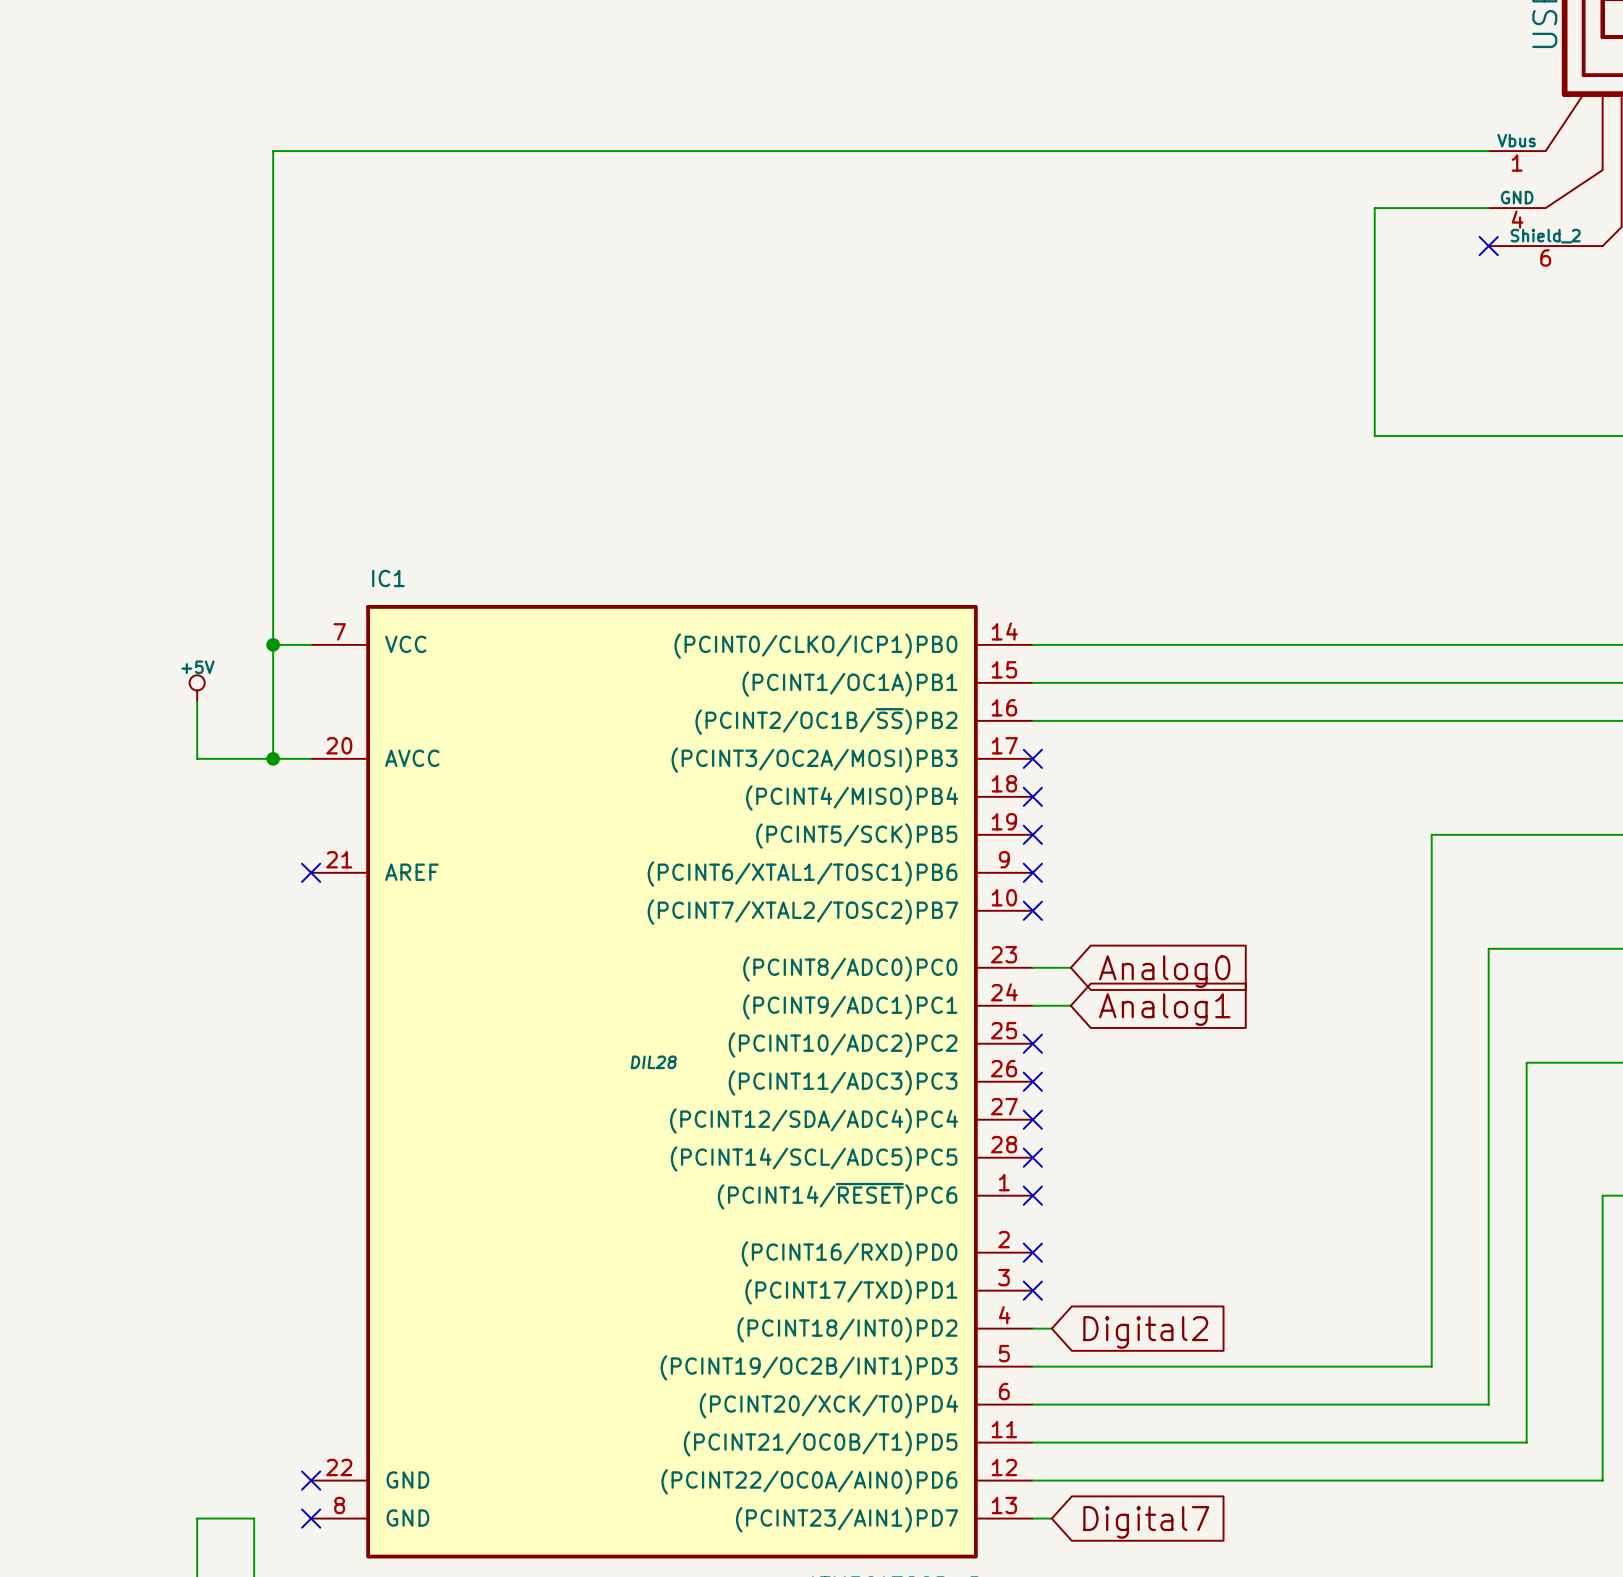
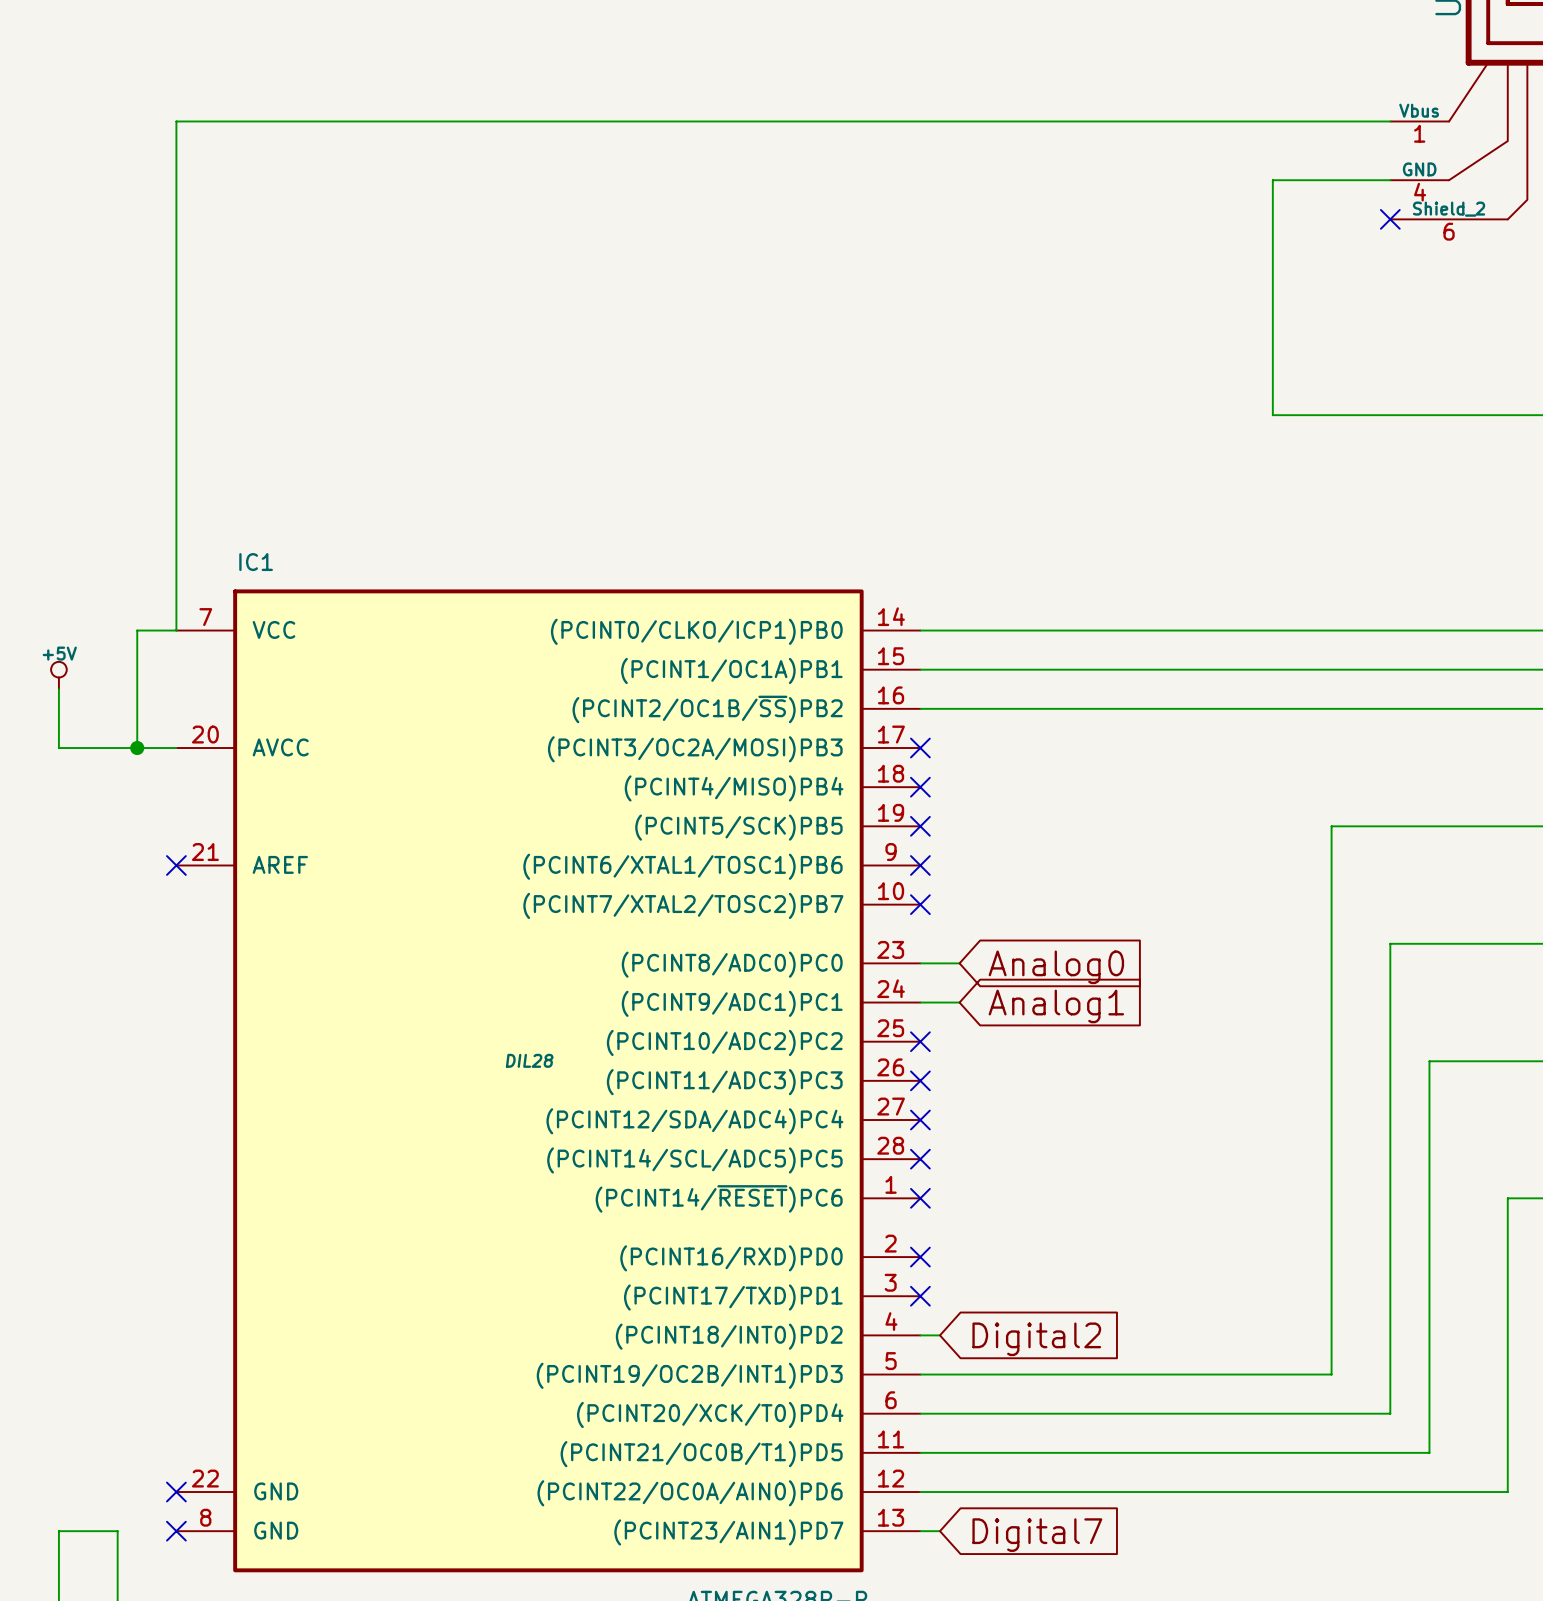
wire: (311, 151) (273, 151) (273, 644) -> (176, 121) (176, 630)
junction: (273, 644) -> none

